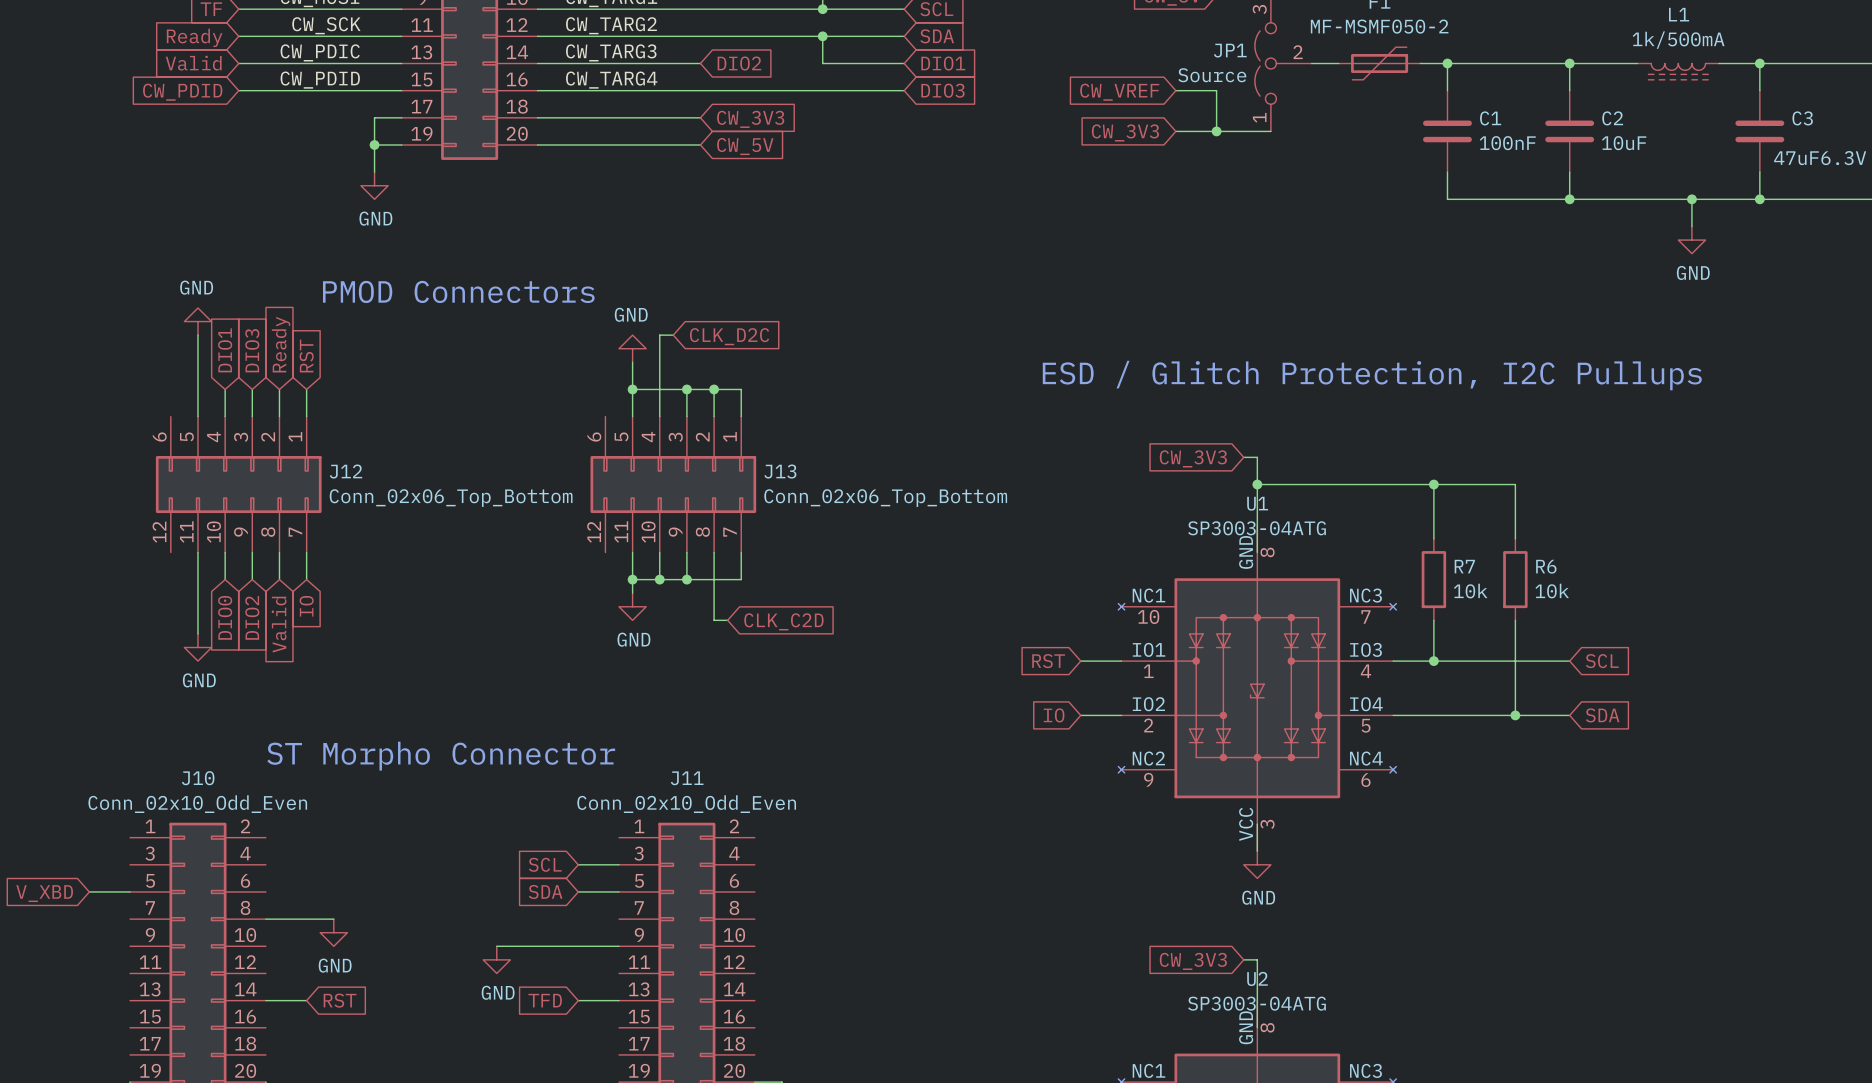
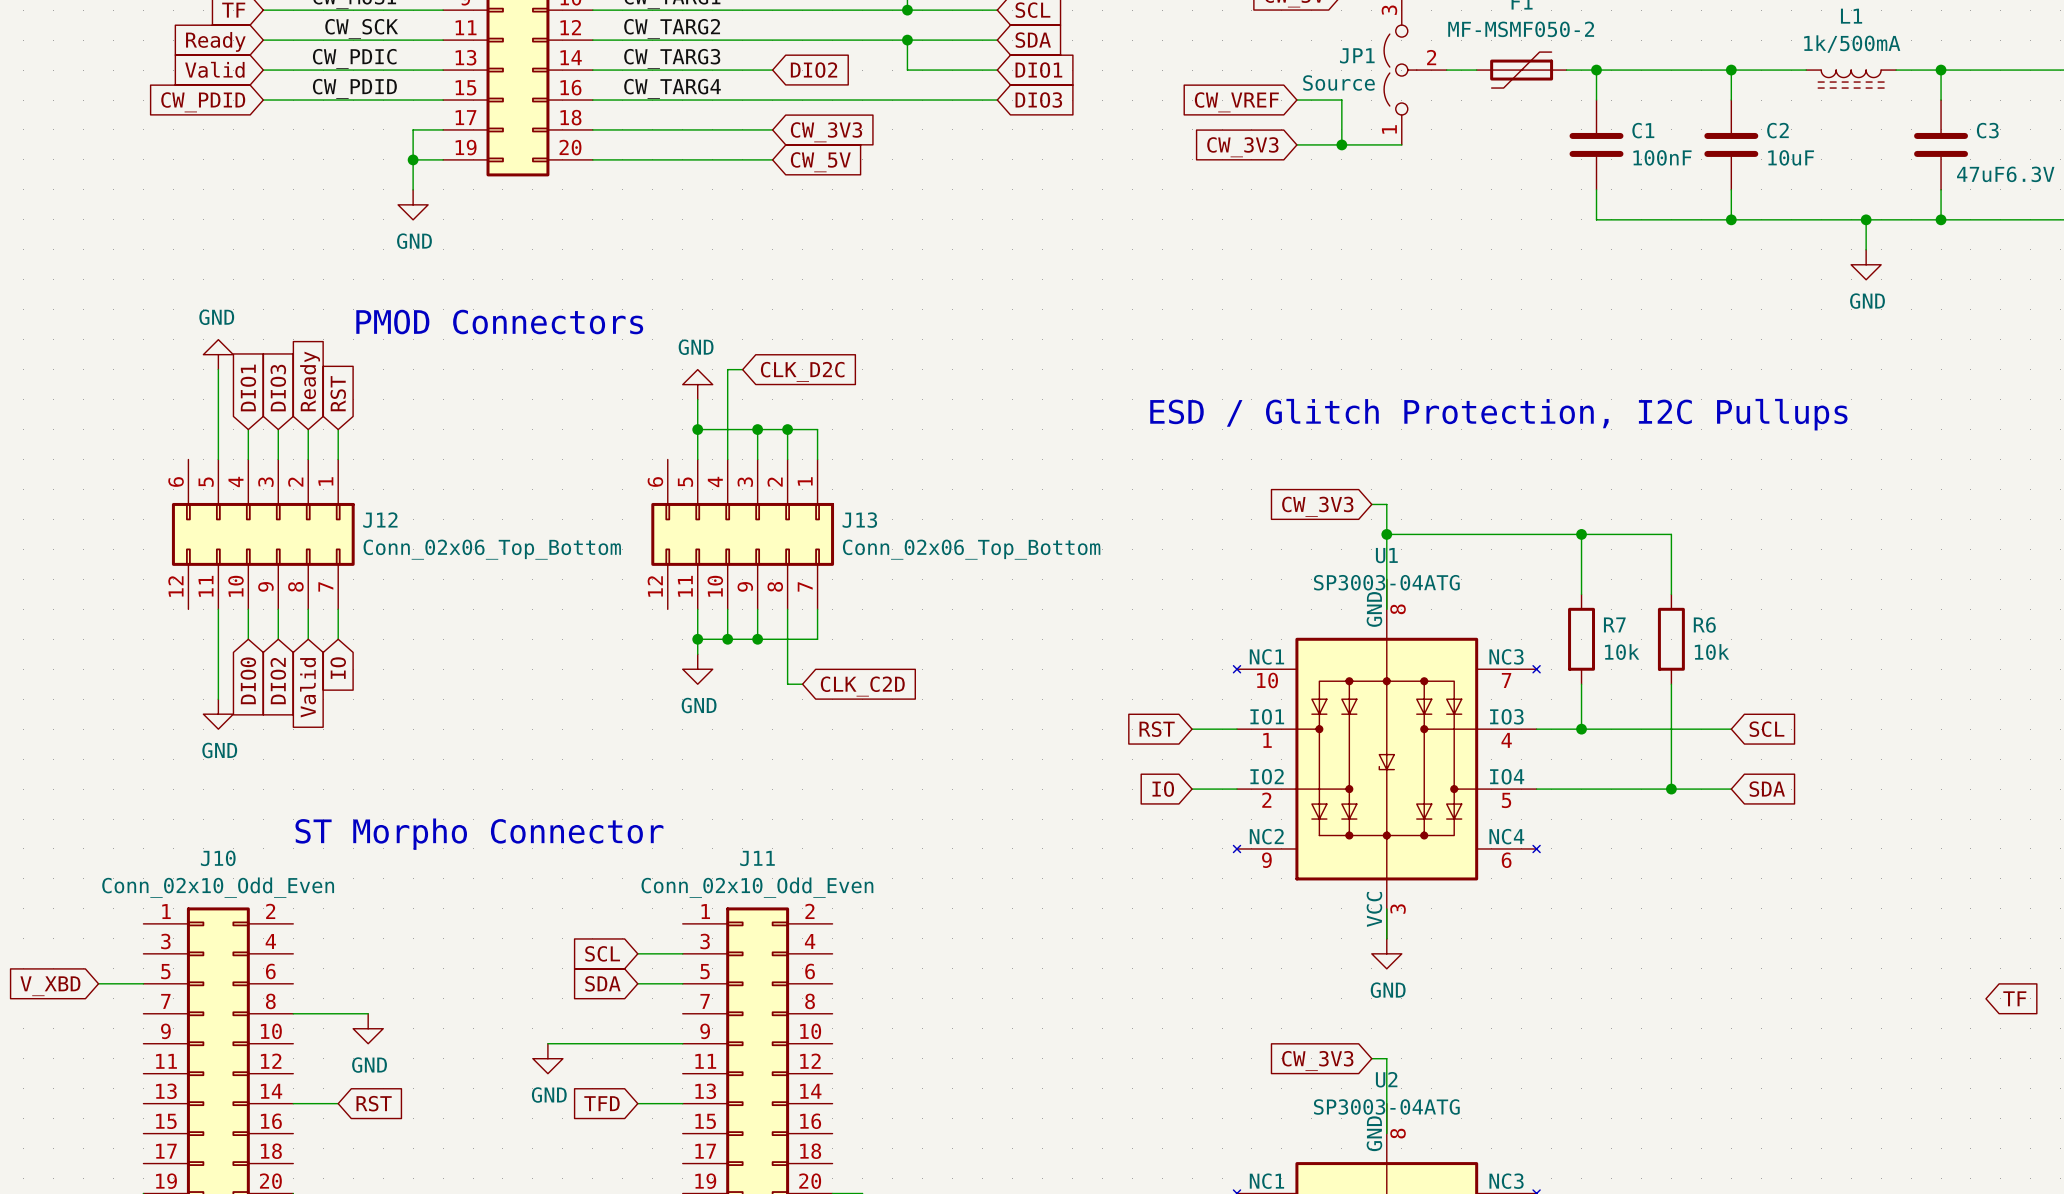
global label: none -> TF (2014, 998)

